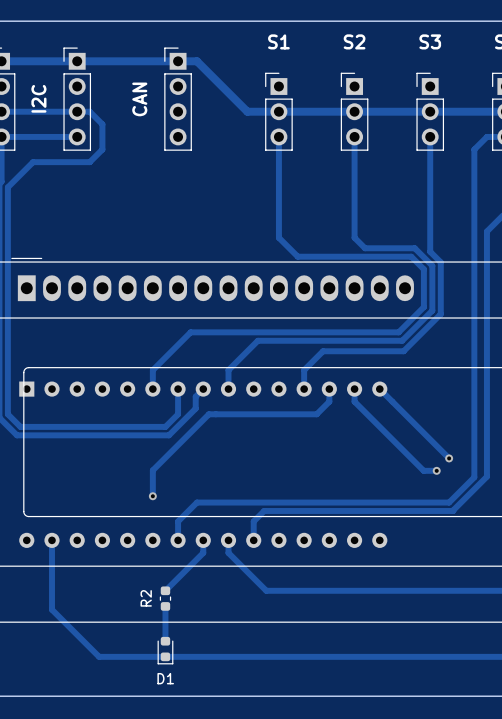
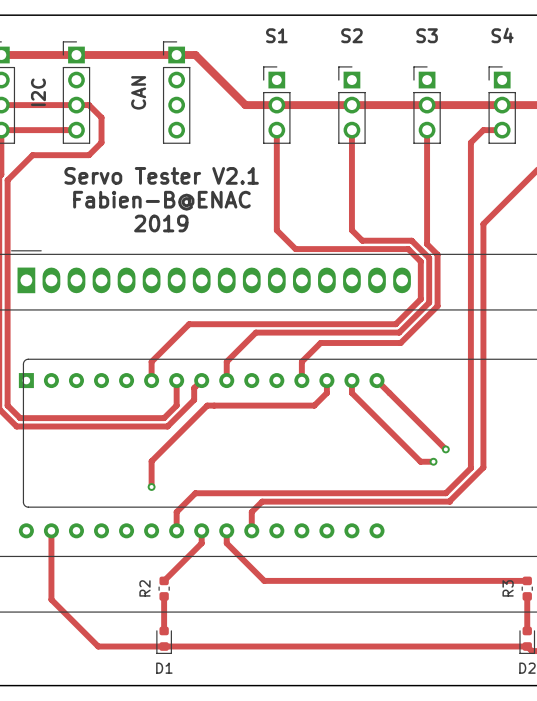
text: none -> Servo Tester V2.1 (161, 175)
text: none -> Fabien-B@ENAC (161, 200)
text: none -> 2019 (161, 223)

